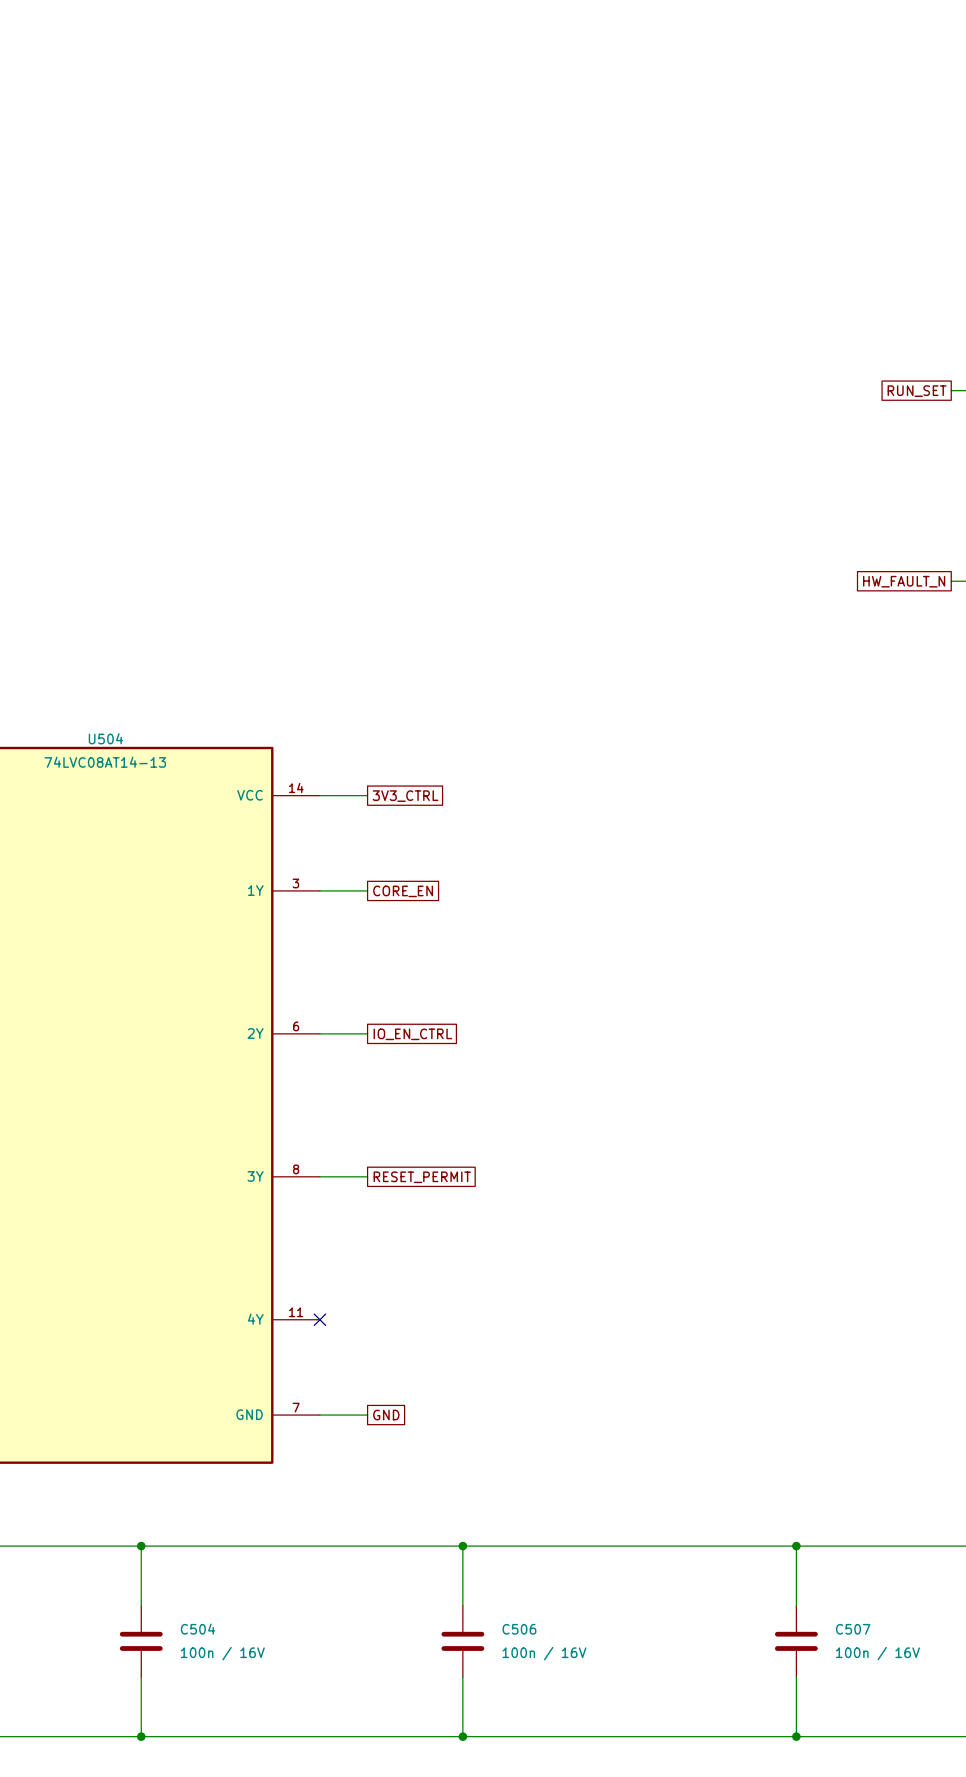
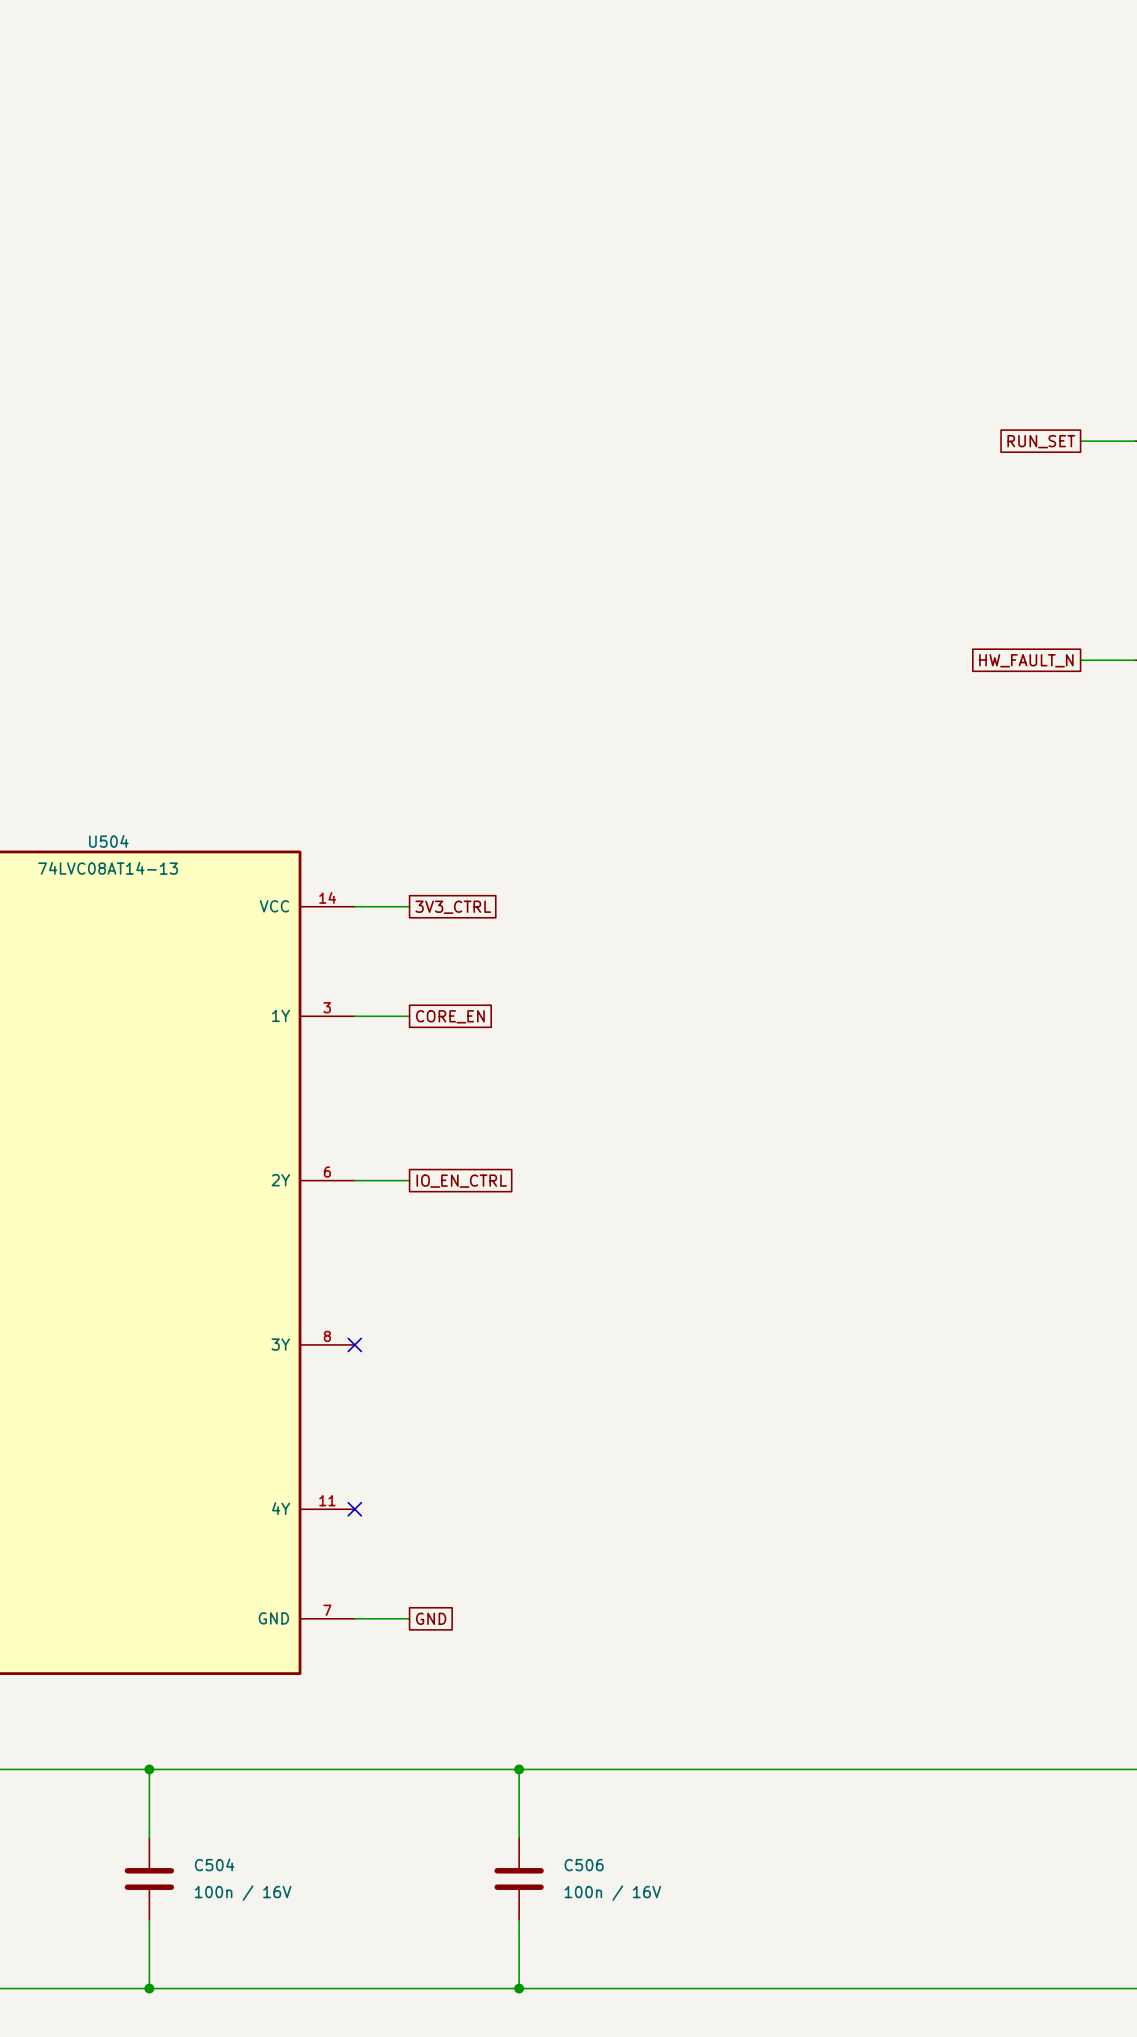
wire: (319, 1176) (367, 1176) -> none
no-connect mark: none -> (354, 1344)
global label: RESET_PERMIT (422, 1177) -> none
wire: (796, 1546) (796, 1605) -> none
junction: (796, 1546) -> none
C507: 100n / 16V (796, 1641) -> none
wire: (796, 1677) (796, 1736) -> none
junction: (796, 1736) -> none

